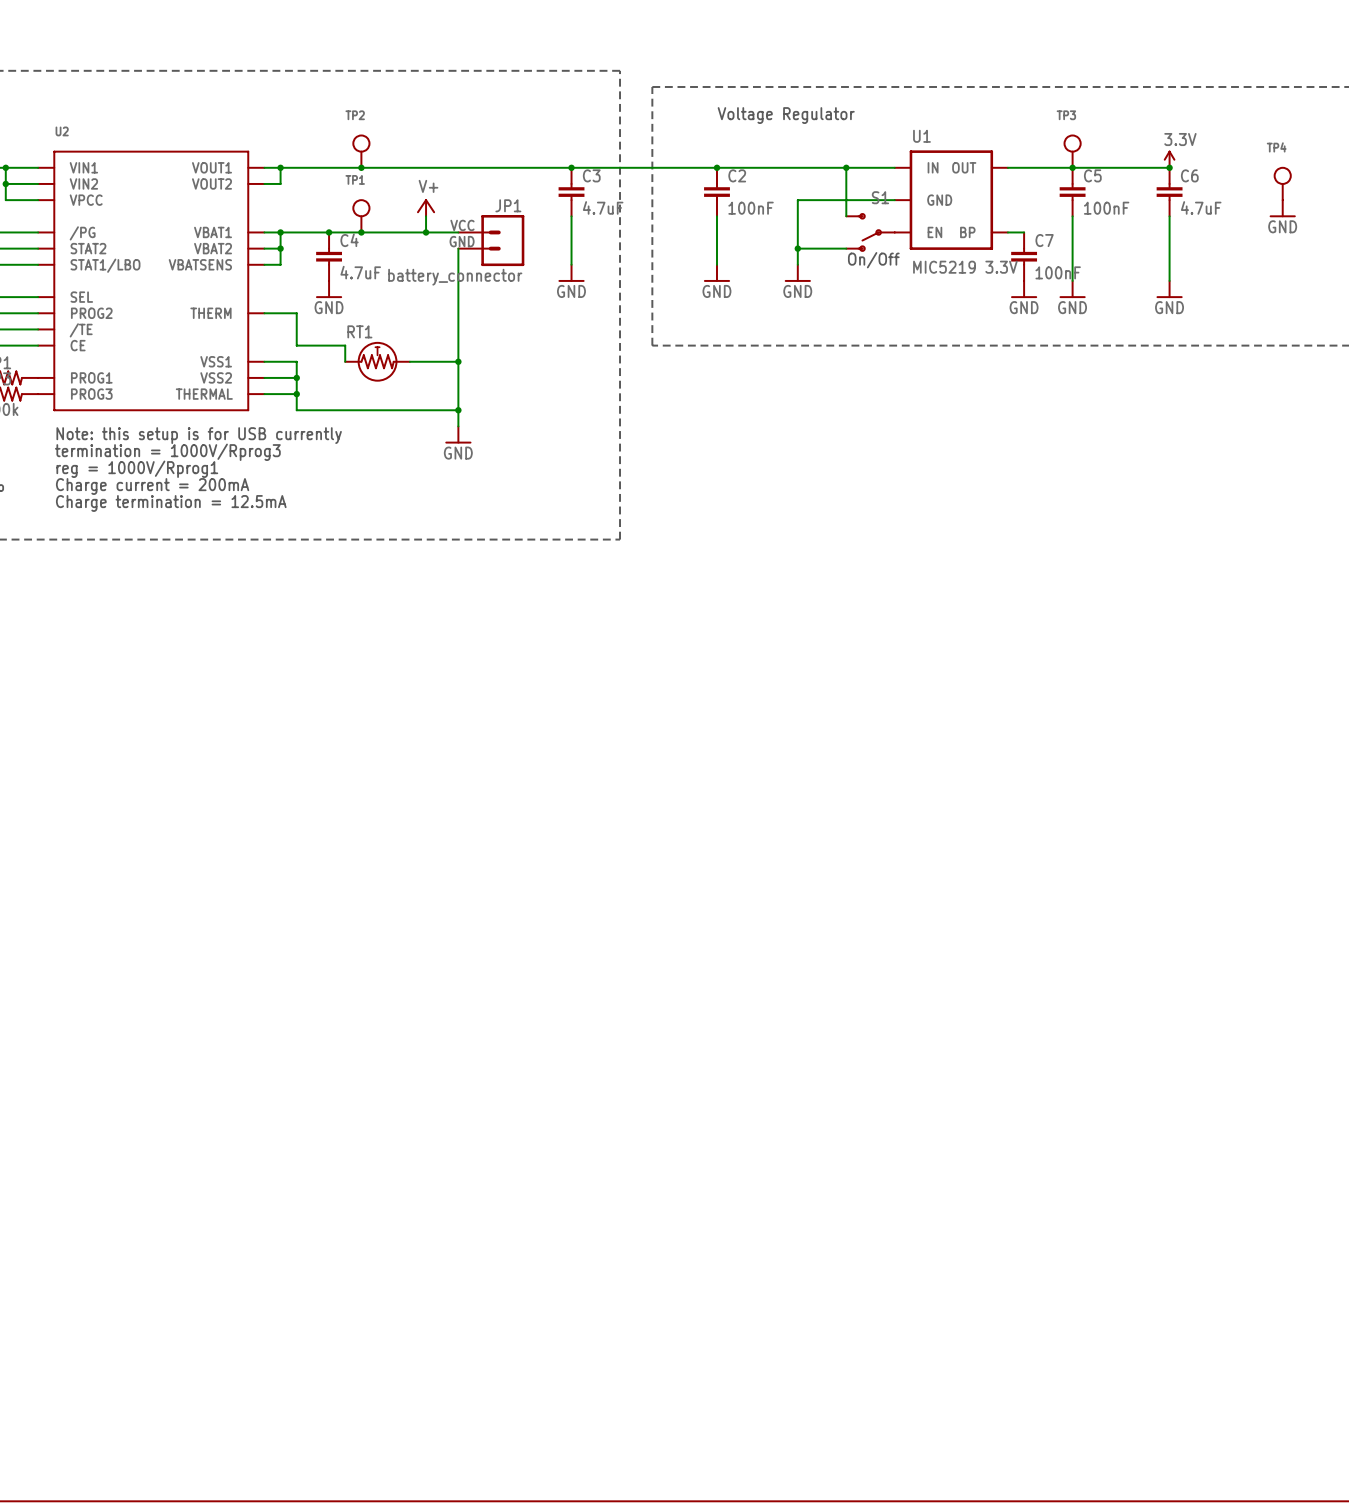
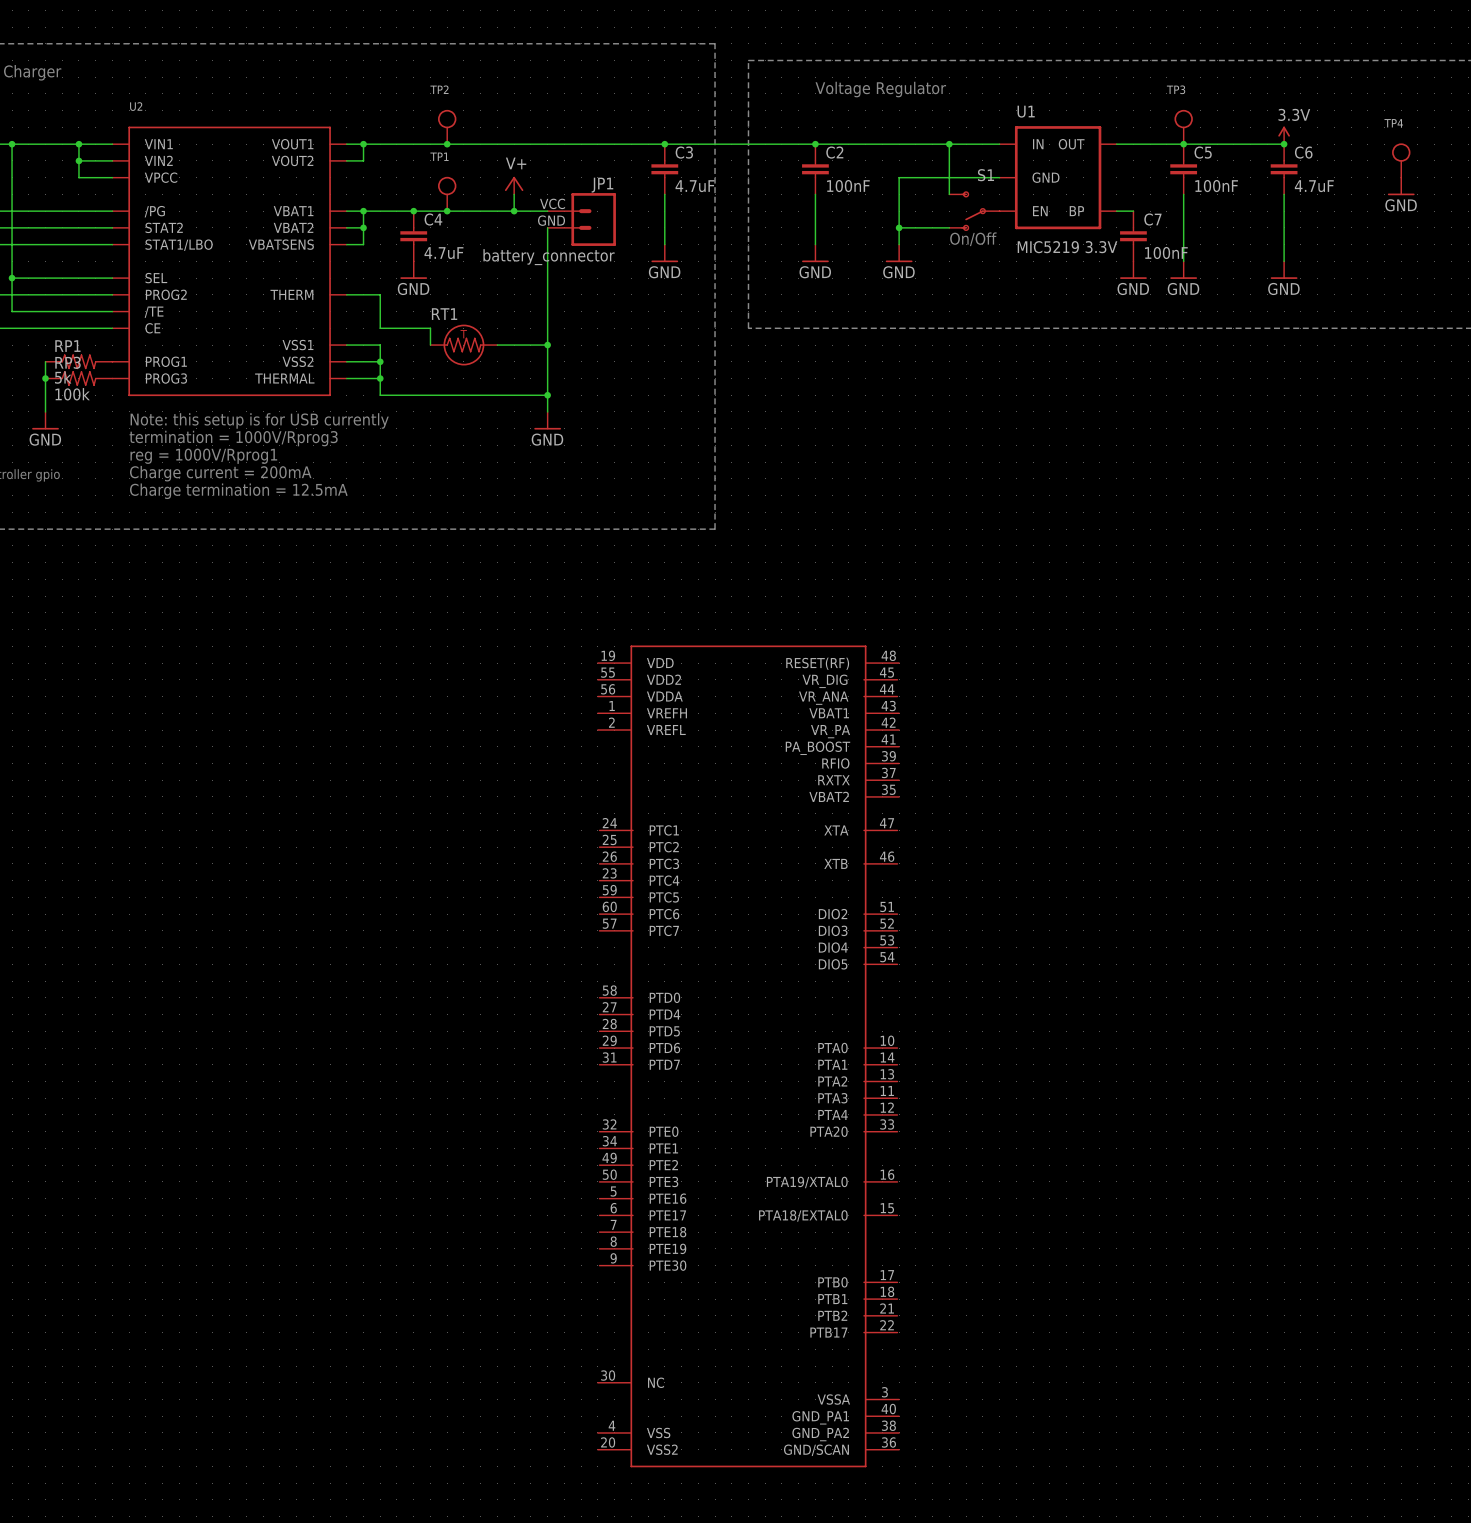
part: none -> (748, 1056)

